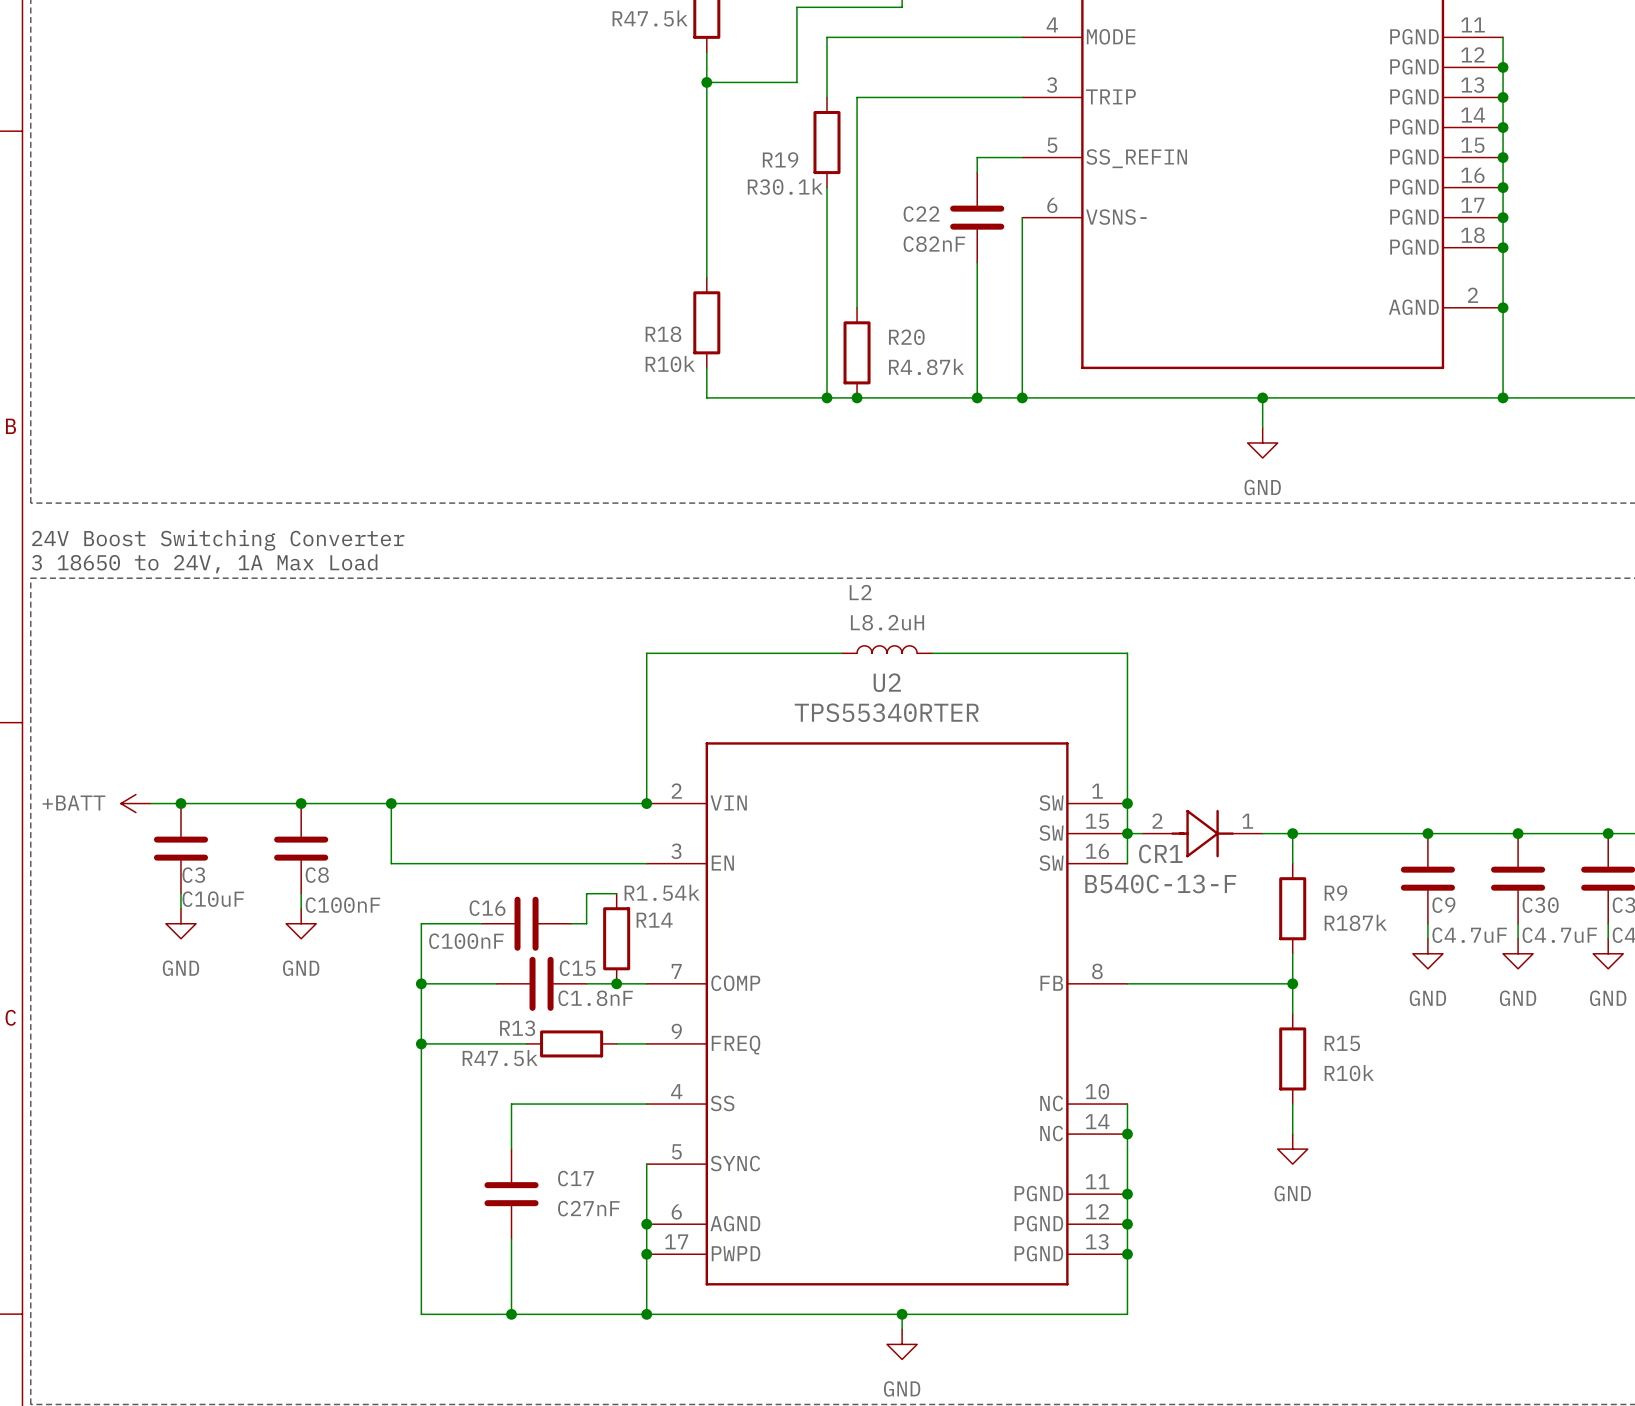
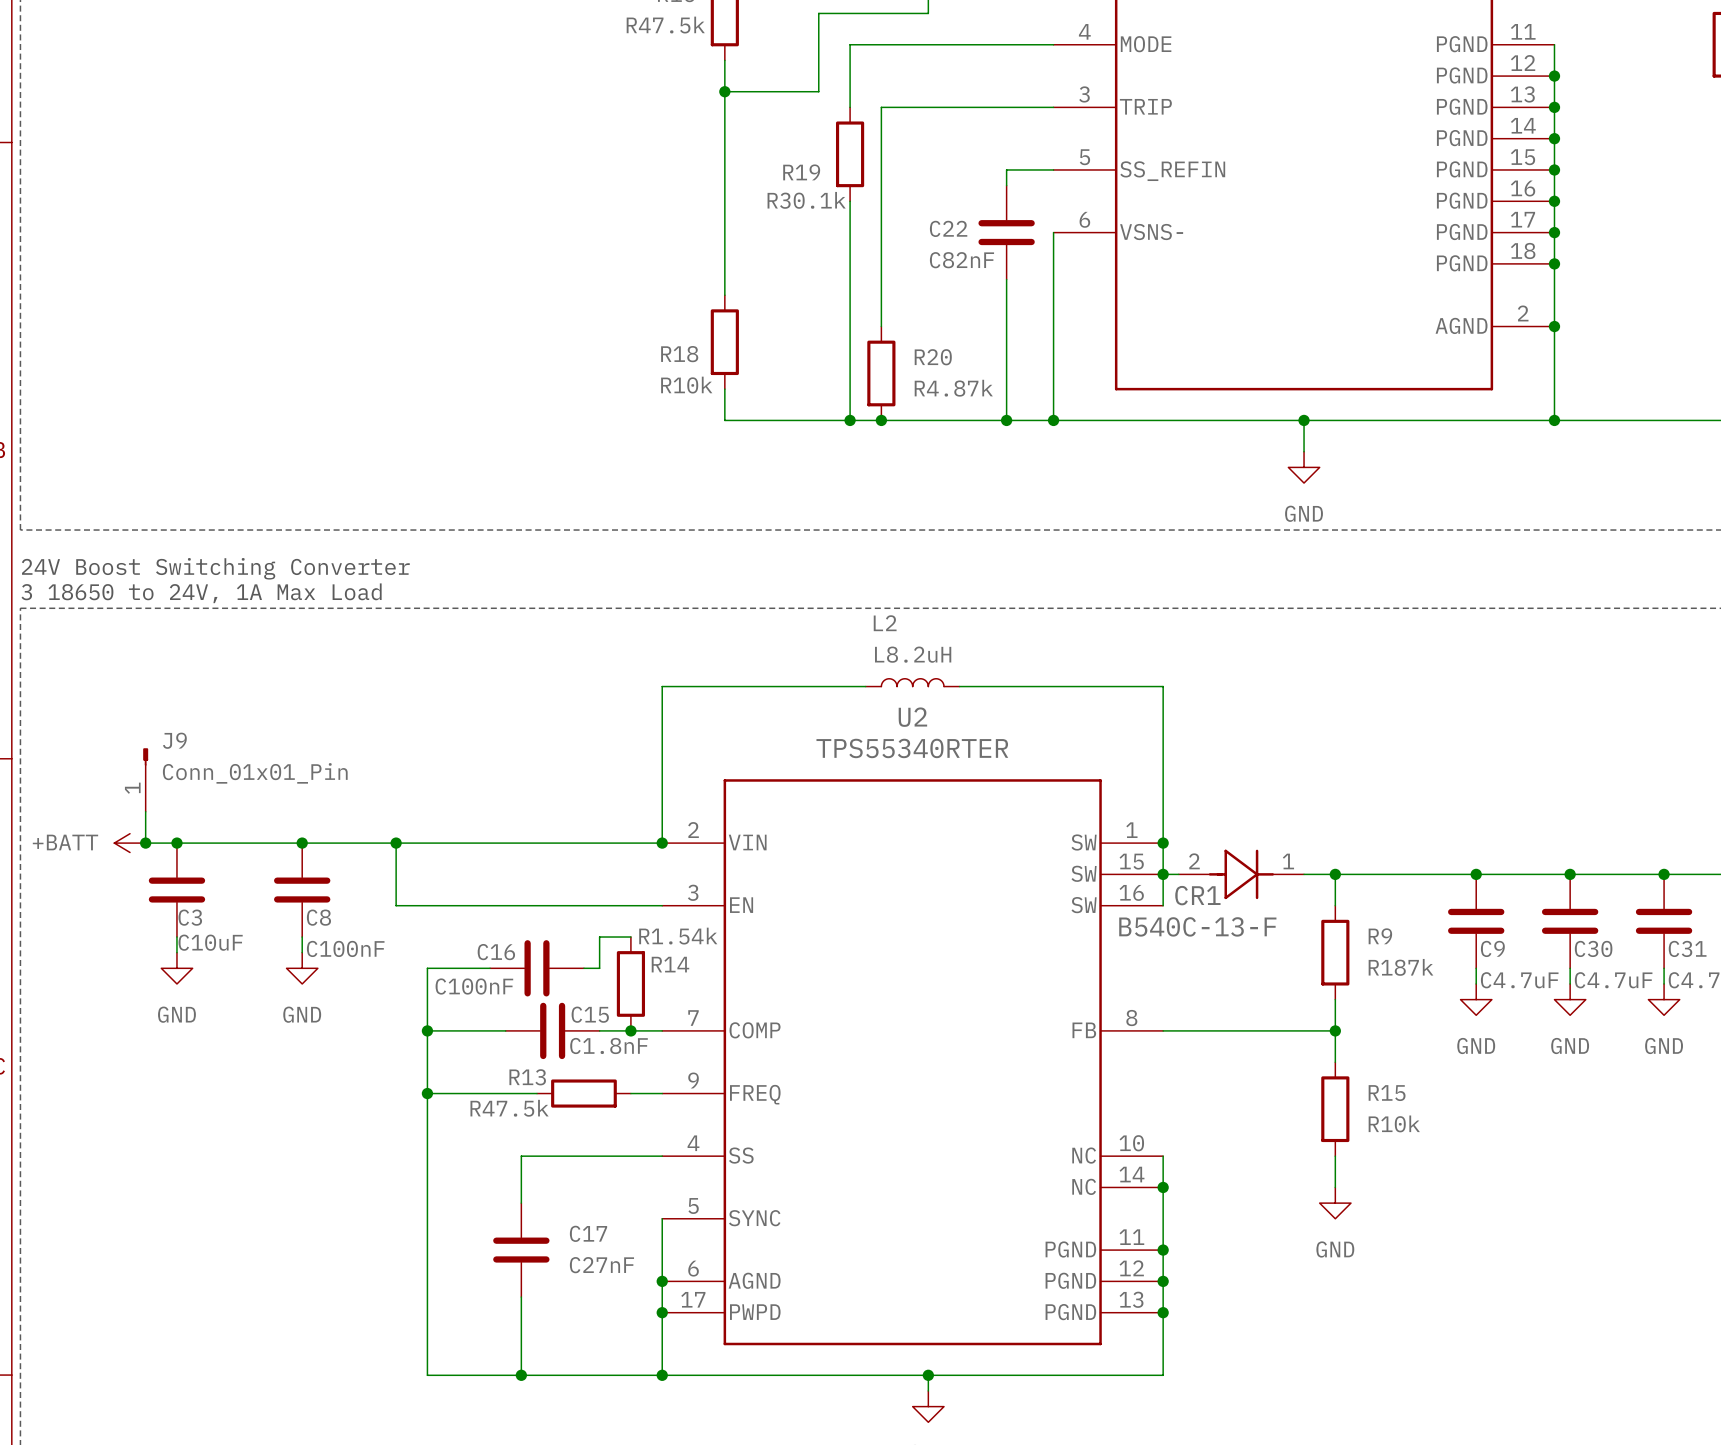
J9: none -> Conn_01x01_Pin (145, 780)
wire: none -> (145, 811) (145, 843)
junction: none -> (145, 843)

